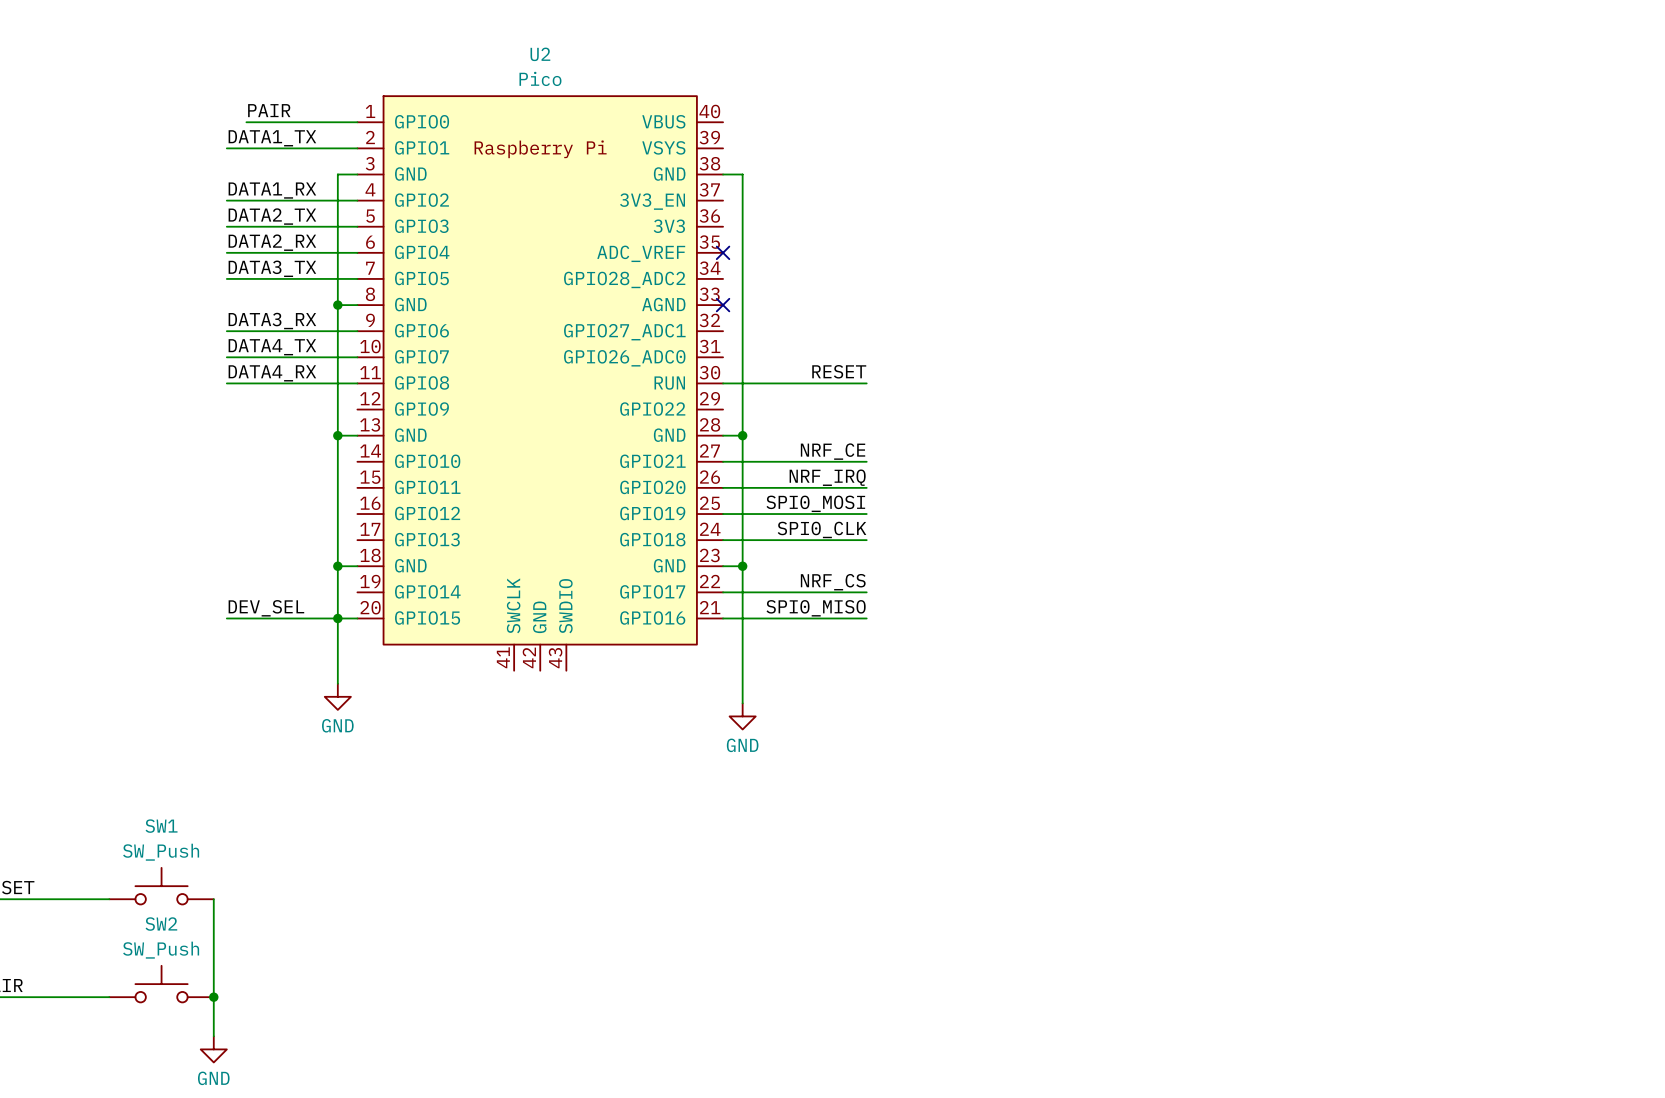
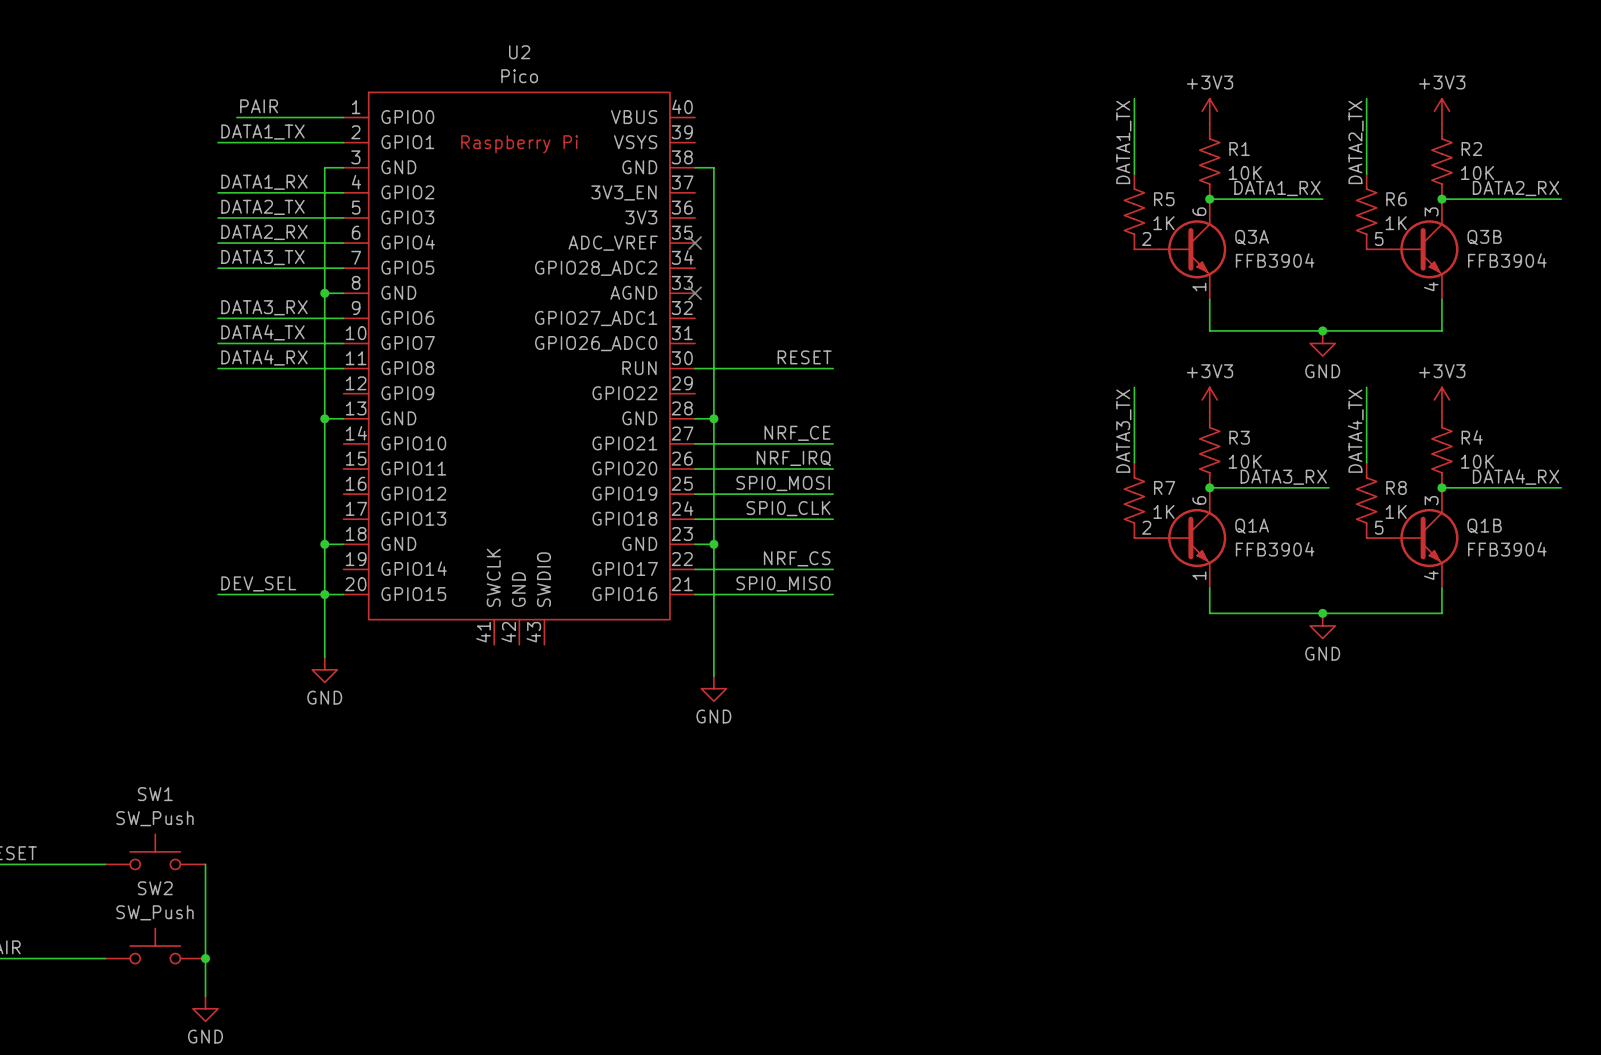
wire: none -> (1134, 98) (1134, 174)
wire: none -> (1366, 98) (1366, 174)
power symbol: none -> +3V3 (1209, 111)
power symbol: none -> +3V3 (1441, 111)
label: none -> DATA1_TX (1123, 142)
label: none -> DATA2_TX (1356, 142)
R1: none -> 10K (1209, 161)
R2: none -> 10K (1441, 161)
label: none -> DATA2_RX (1515, 188)
label: none -> DATA1_RX (1277, 188)
wire: none -> (1209, 199) (1322, 199)
junction: none -> (1209, 199)
wire: none -> (1441, 199) (1561, 199)
junction: none -> (1441, 199)
R5: none -> 1K (1134, 211)
R6: none -> 1K (1366, 211)
Q3A: none -> FFB3904 (1180, 249)
Q3B: none -> FFB3904 (1412, 249)
wire: none -> (1209, 299) (1209, 330) (1441, 330) (1441, 299)
junction: none -> (1322, 330)
power symbol: none -> GND (1322, 343)
wire: none -> (1134, 387) (1134, 462)
wire: none -> (1366, 387) (1366, 462)
power symbol: none -> +3V3 (1209, 399)
power symbol: none -> +3V3 (1441, 399)
label: none -> DATA3_TX (1123, 431)
label: none -> DATA4_TX (1355, 431)
R3: none -> 10K (1209, 450)
R4: none -> 10K (1441, 450)
label: none -> DATA3_RX (1283, 477)
label: none -> DATA4_RX (1515, 476)
wire: none -> (1209, 487) (1328, 487)
junction: none -> (1209, 487)
wire: none -> (1441, 487) (1561, 487)
junction: none -> (1441, 487)
R7: none -> 1K (1134, 500)
R8: none -> 1K (1366, 500)
Q1A: none -> FFB3904 (1180, 538)
Q1B: none -> FFB3904 (1412, 538)
wire: none -> (1209, 588) (1209, 613) (1441, 613) (1441, 588)
junction: none -> (1322, 613)
power symbol: none -> GND (1322, 625)

